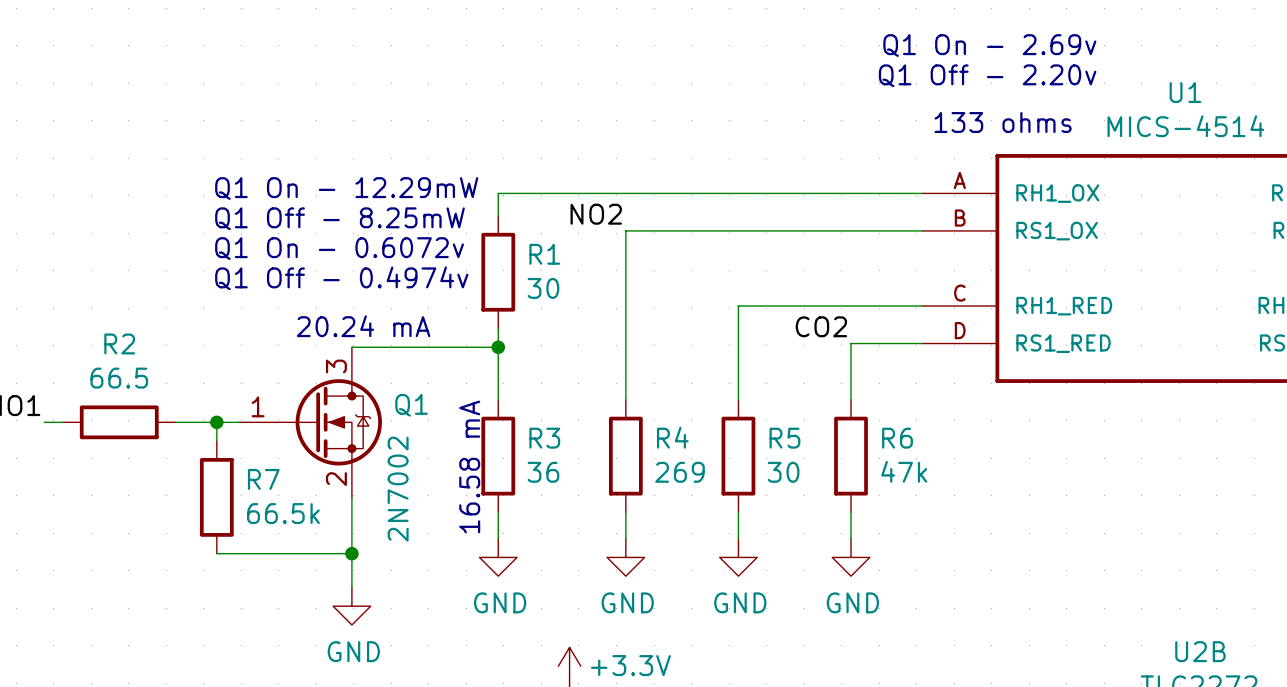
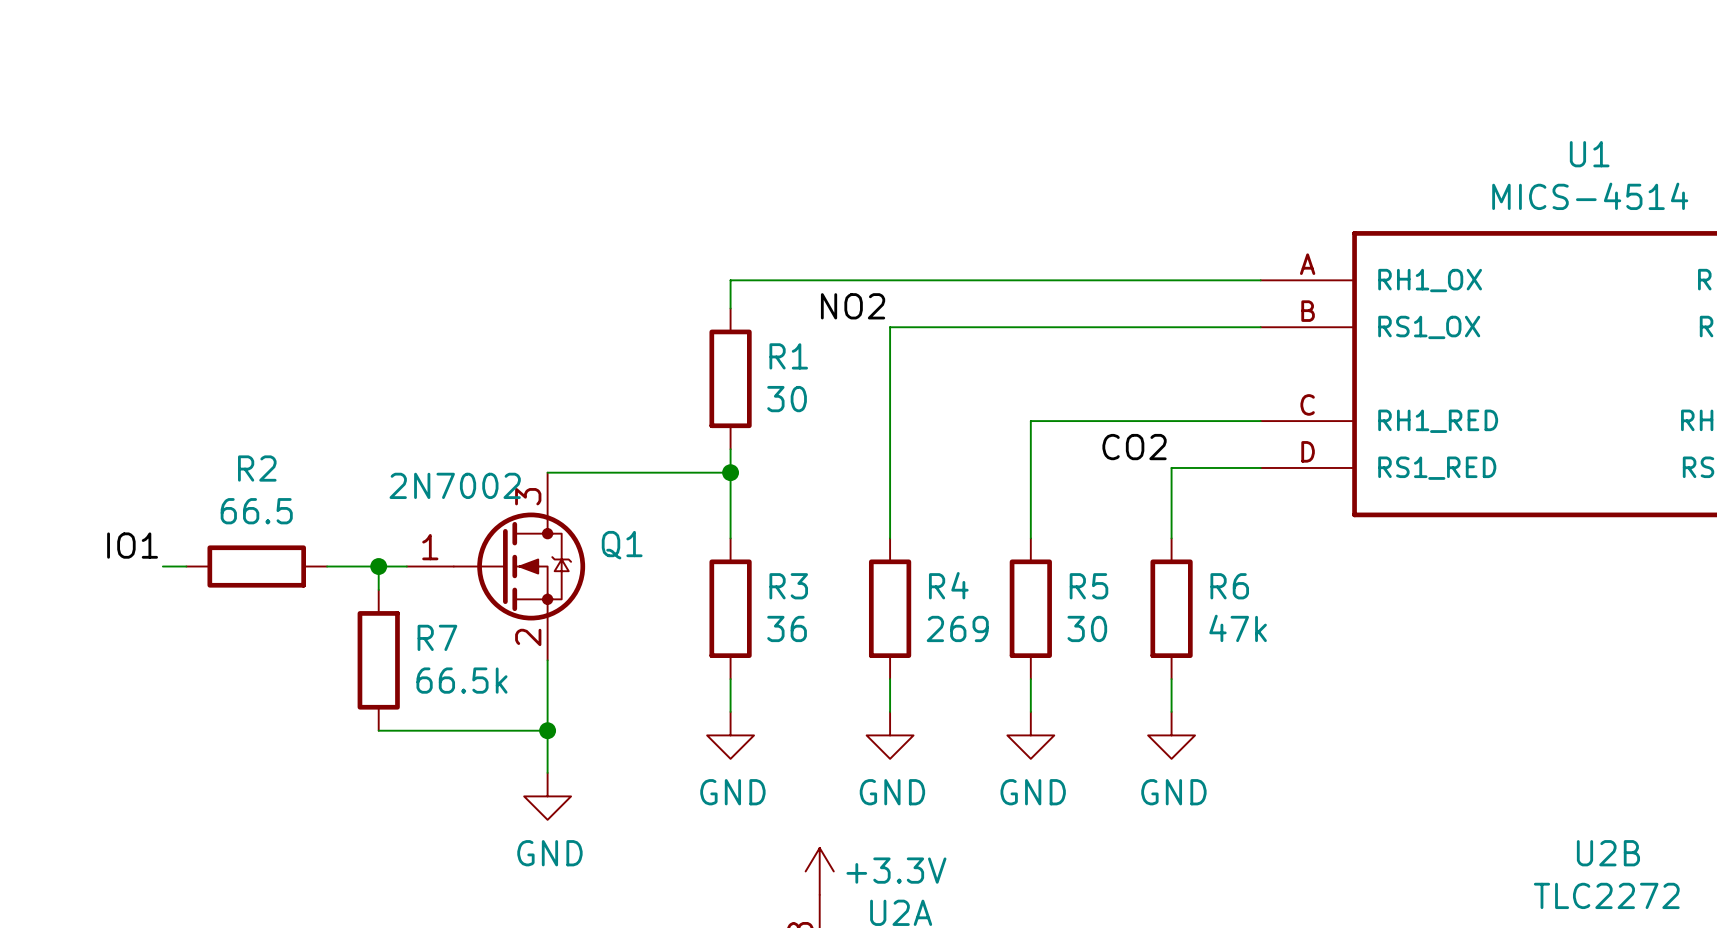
text: Q1 On - 2.69v (989, 45) -> none
text: Q1 Off - 2.20v (987, 75) -> none
text: 133 ohms (1003, 122) -> none
text: Q1 On - 12.29mW (346, 188) -> none
text: Q1 Off - 8.25mW (339, 218) -> none
text: Q1 On - 0.6072v (339, 248) -> none
text: Q1 Off - 0.4974v (341, 278) -> none
text: 20.24 mA (363, 326) -> none
text: 16.58 mA (469, 466) -> none
Q1 value rotation: 0° (398, 489) -> 90° clockwise (455, 485)
Q1 value position: 2N7002 (398, 489) -> 2N7002 (455, 485)

